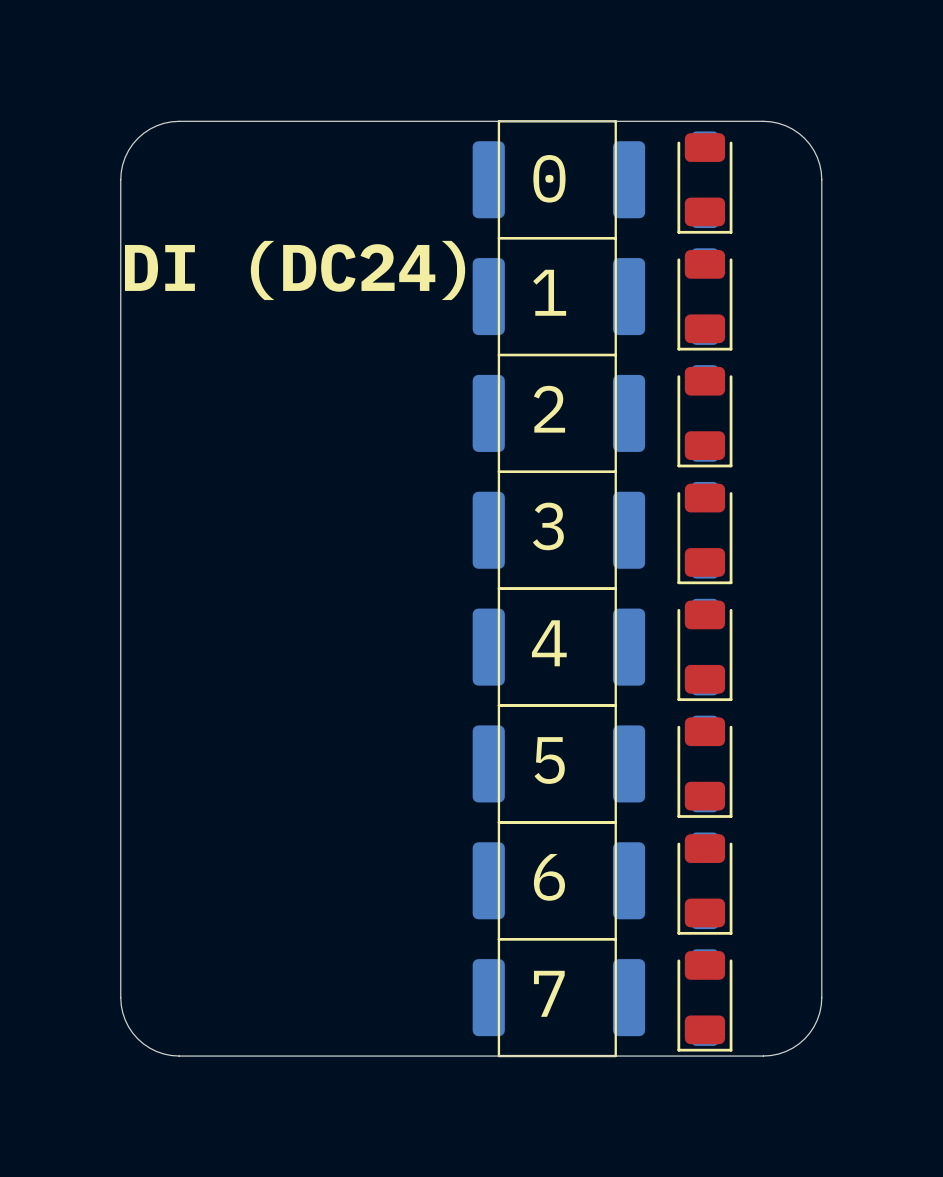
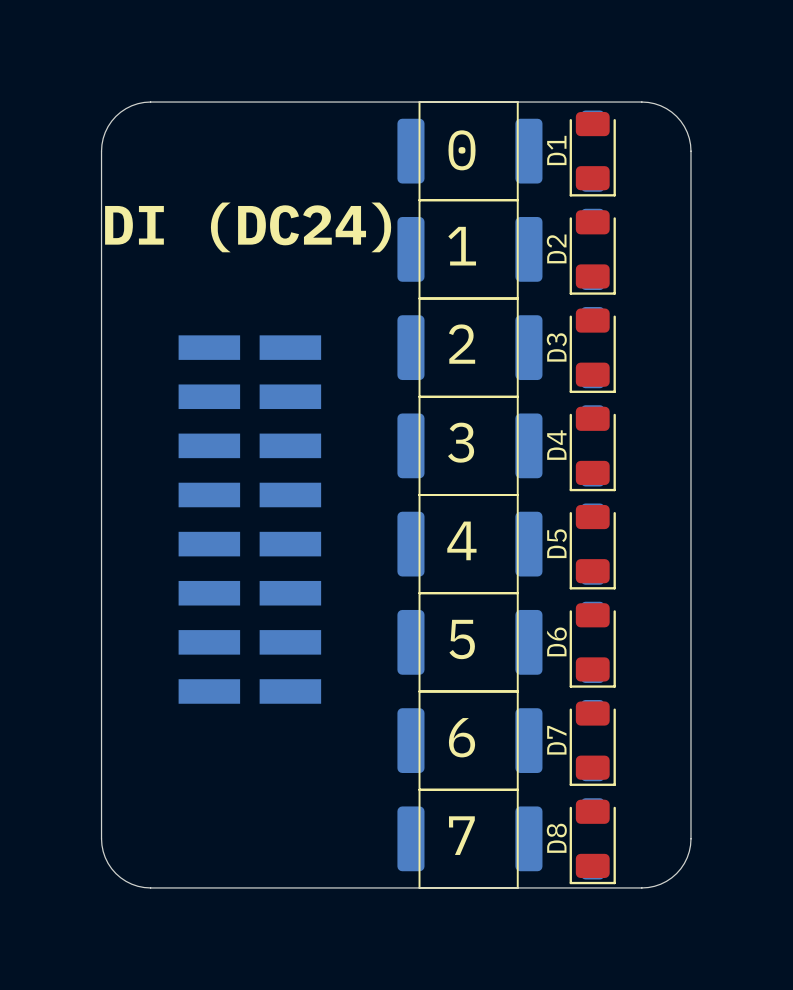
D1 name: none -> D1 (556, 150)
D2 name: none -> D2 (556, 248)
D3 name: none -> D3 (556, 347)
D4 name: none -> D4 (556, 445)
part: none -> (249, 519)
D5 name: none -> D5 (557, 543)
D6 name: none -> D6 (557, 641)
D7 name: none -> D7 (556, 740)
D8 name: none -> D8 (556, 838)

